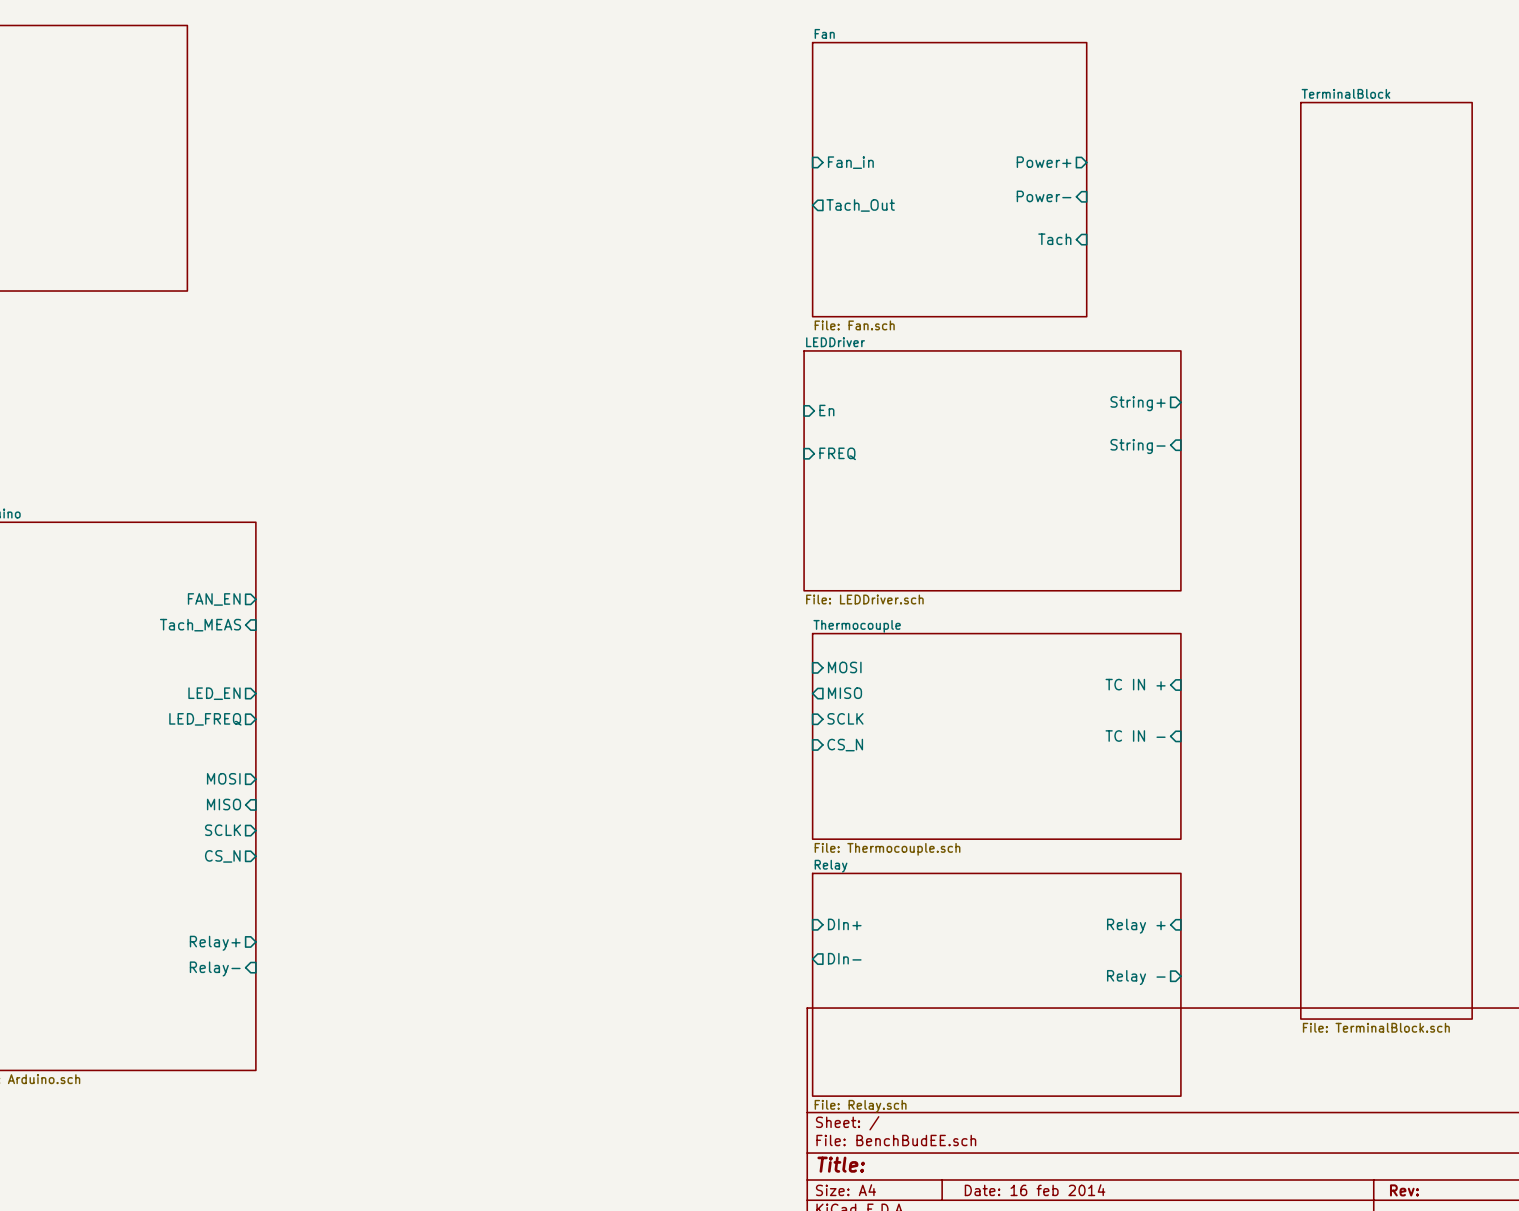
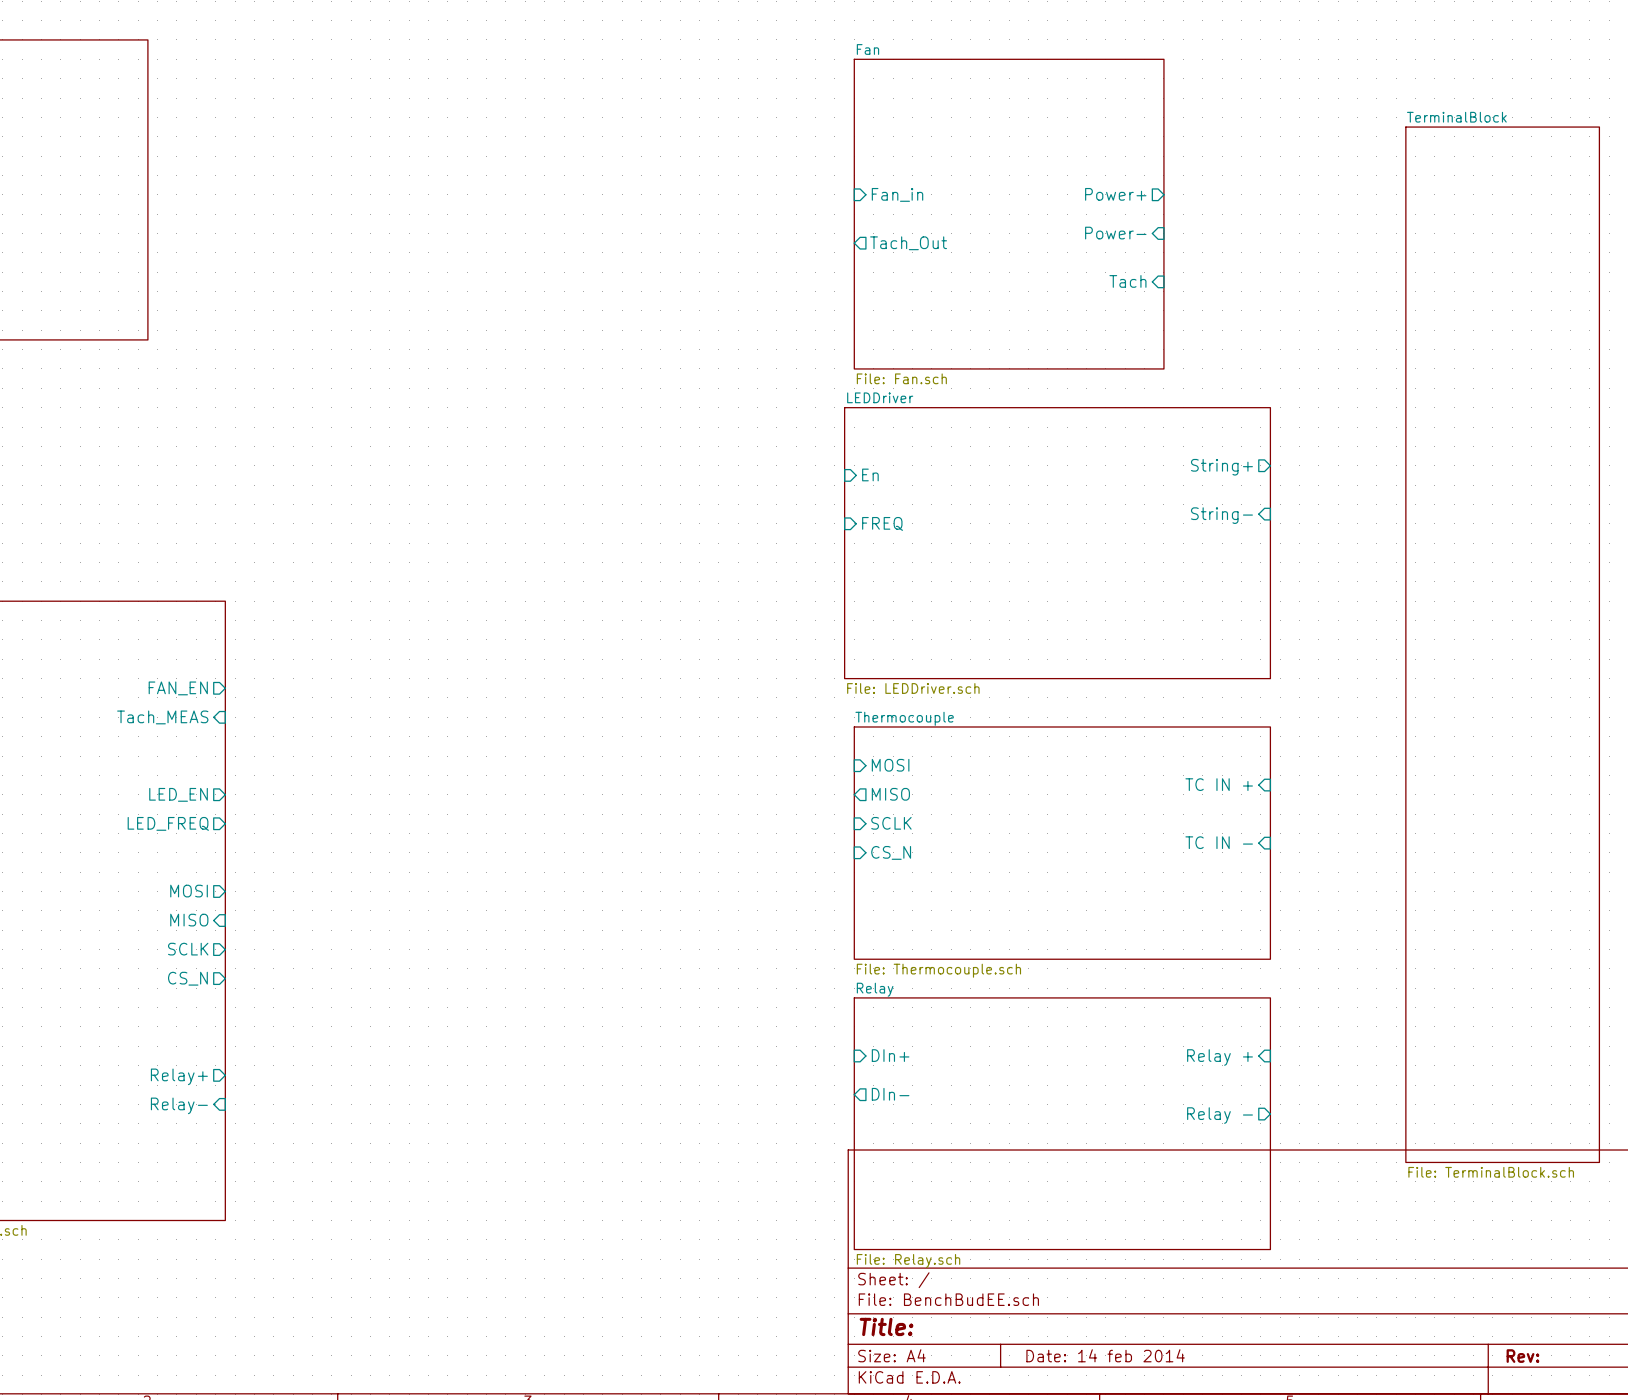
title block: Date: 16 feb 2014 (1035, 1190) -> Date: 14 feb 2014 (1105, 1355)

